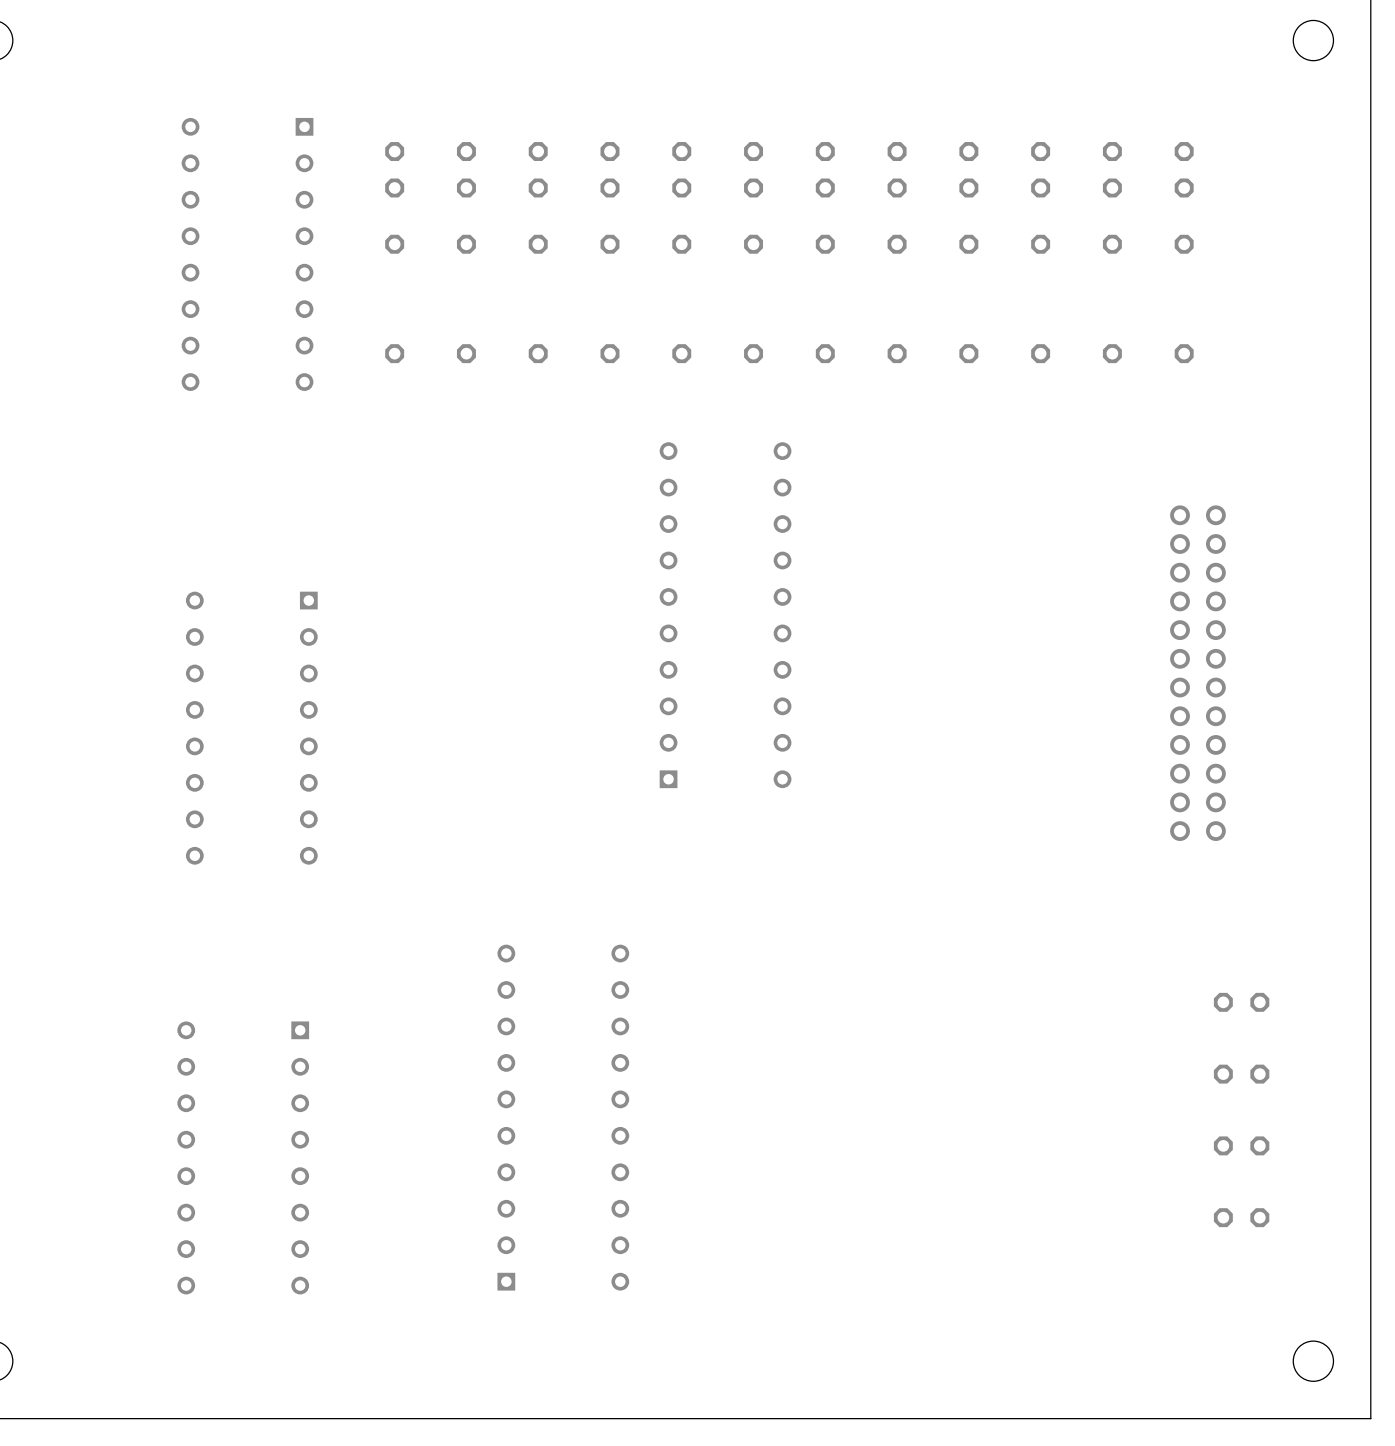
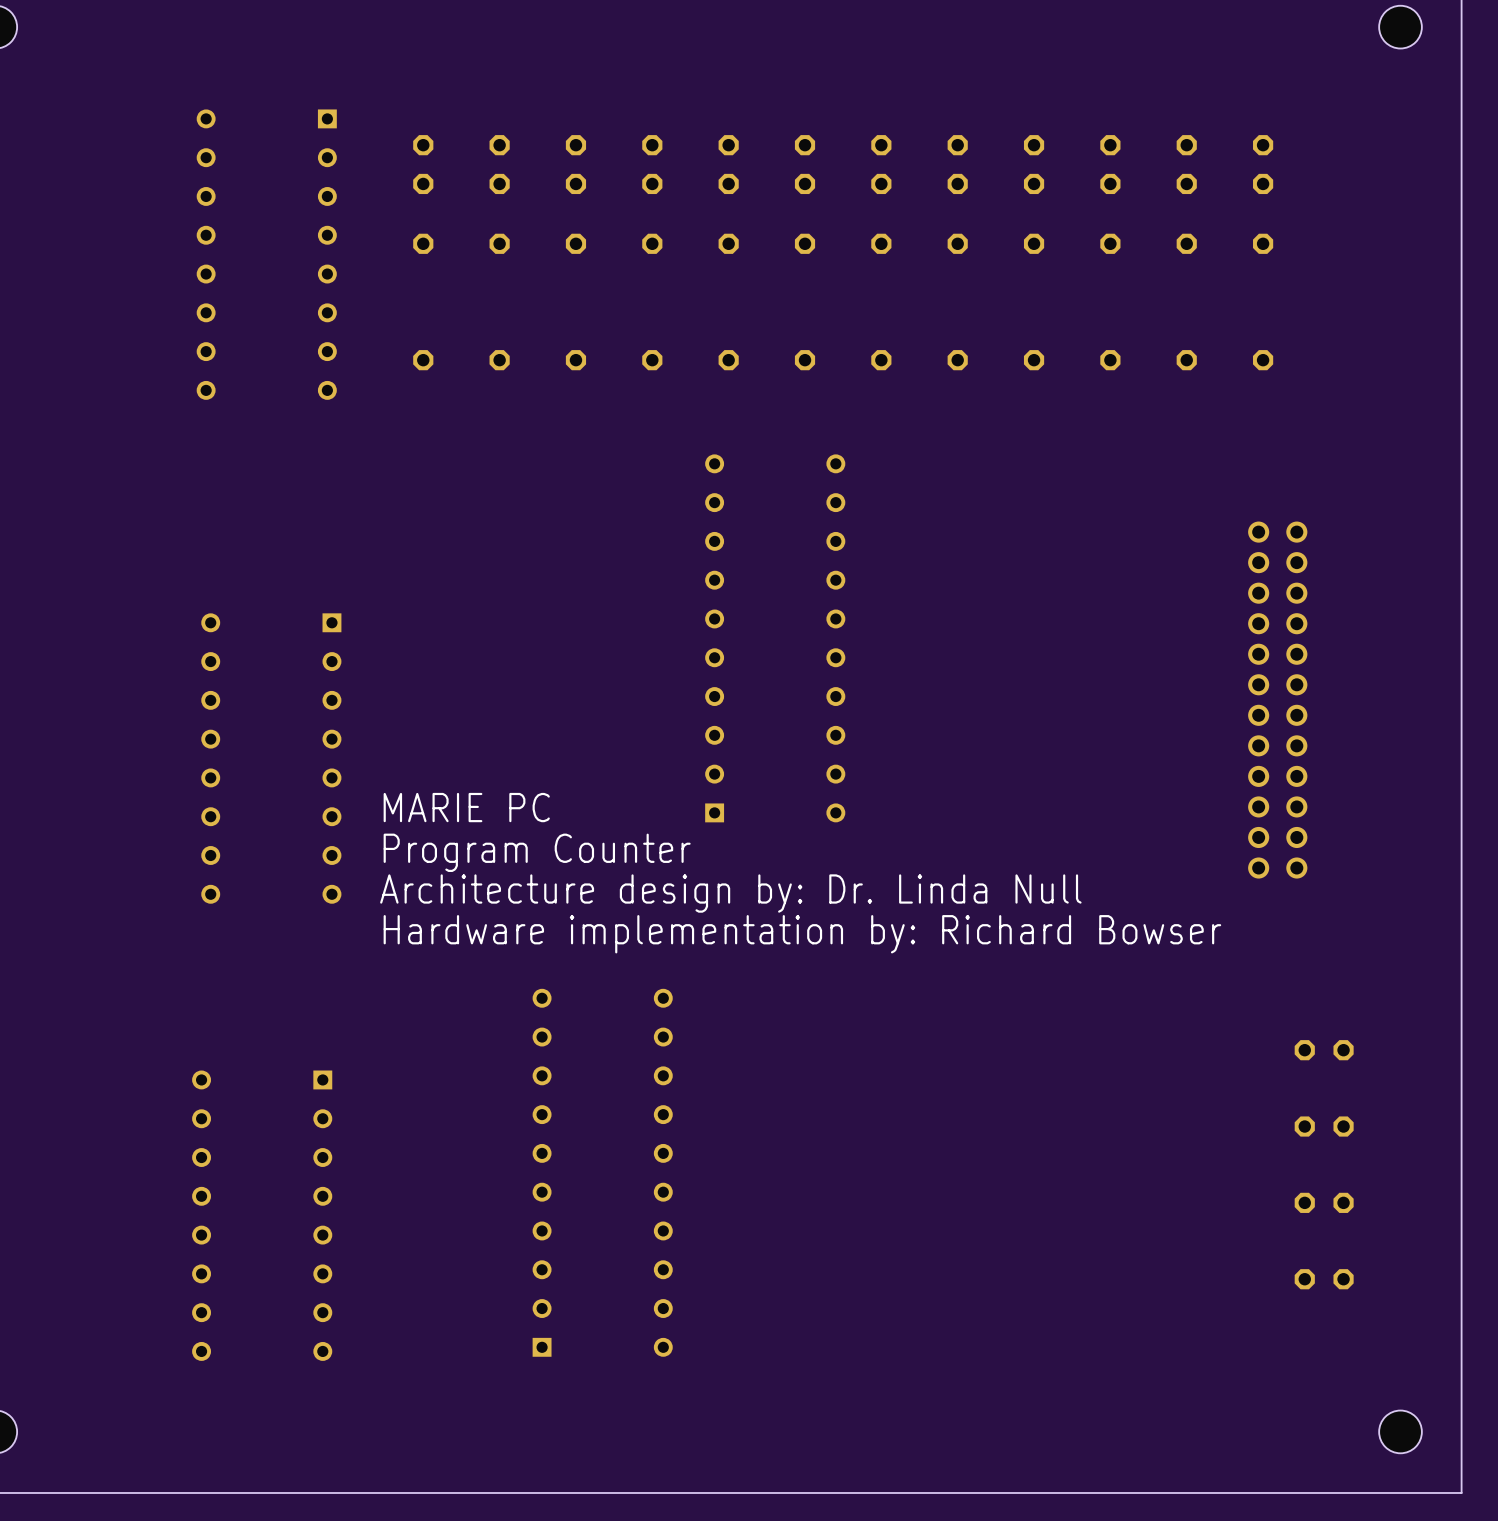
text: none -> MARIE PC (466, 807)
text: none -> Program Counter (537, 852)
text: none -> Architecture design by: Dr. Linda Null (730, 893)
text: none -> Hardware implementation by: Richard Bowser (802, 934)

